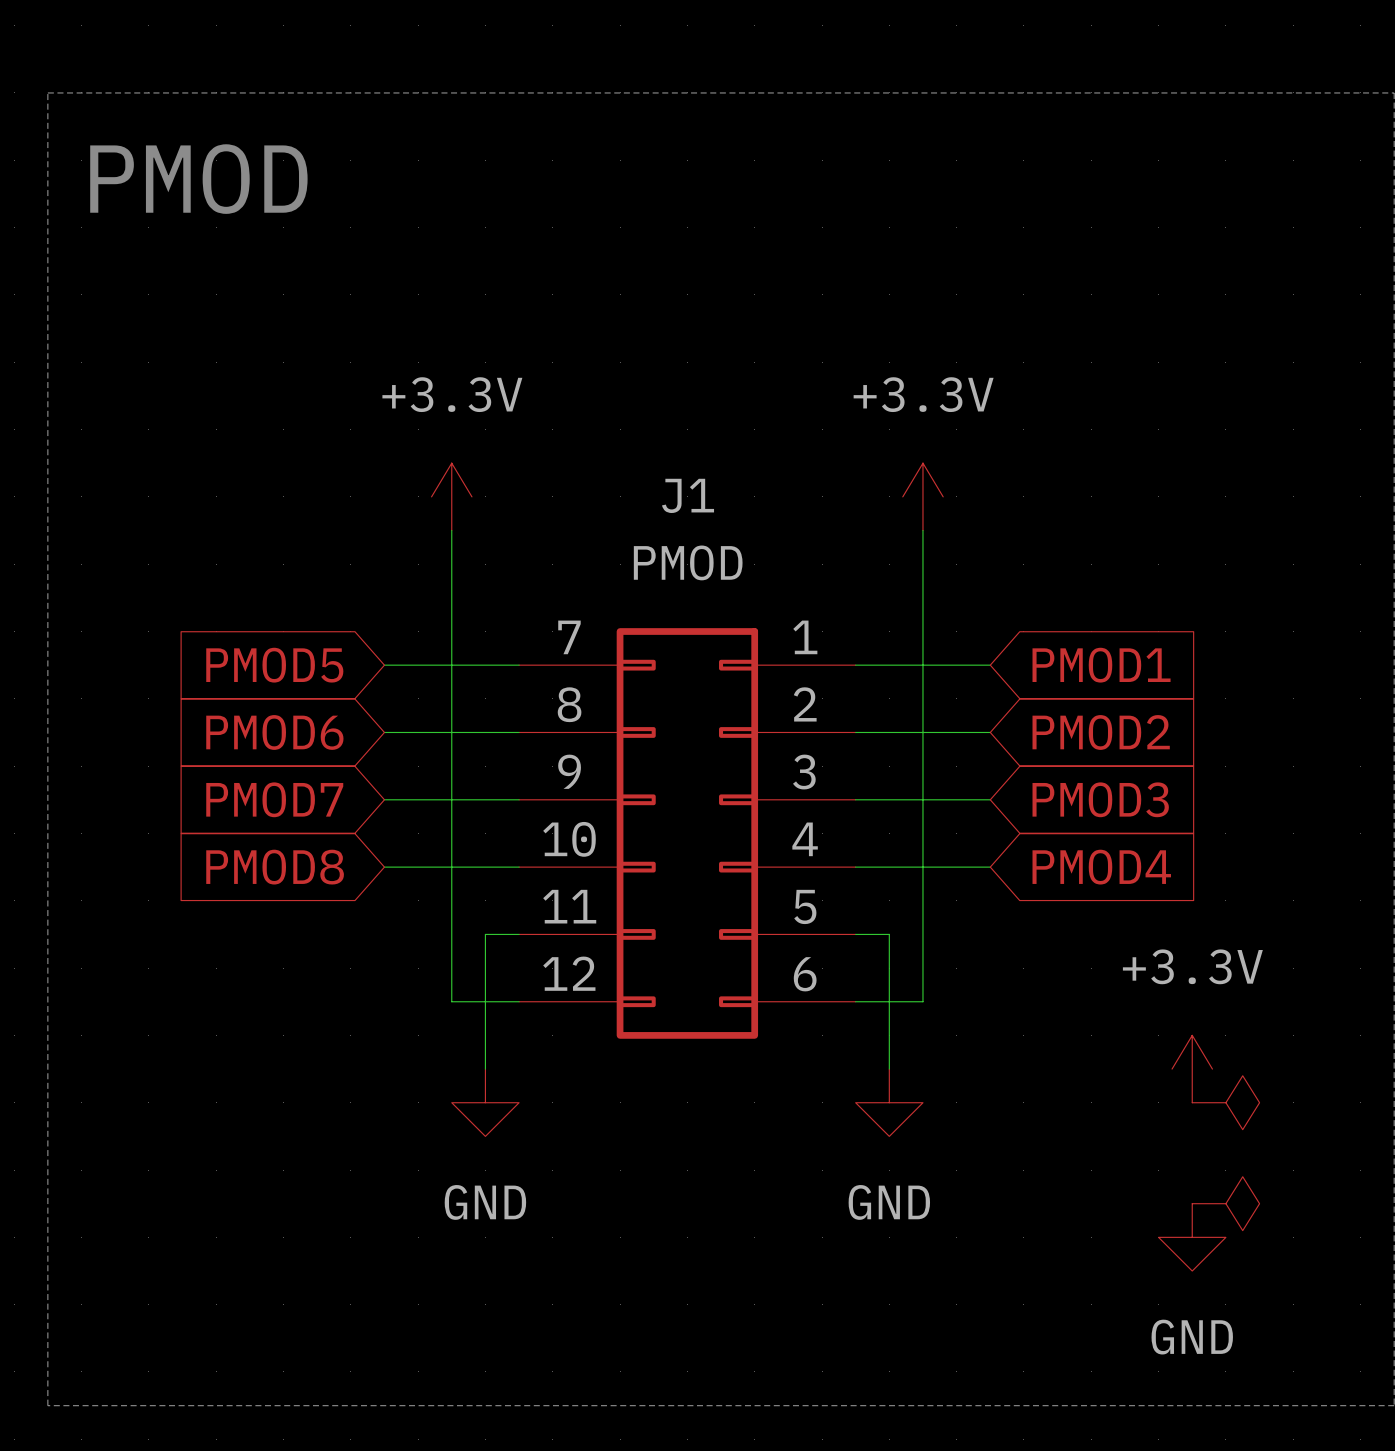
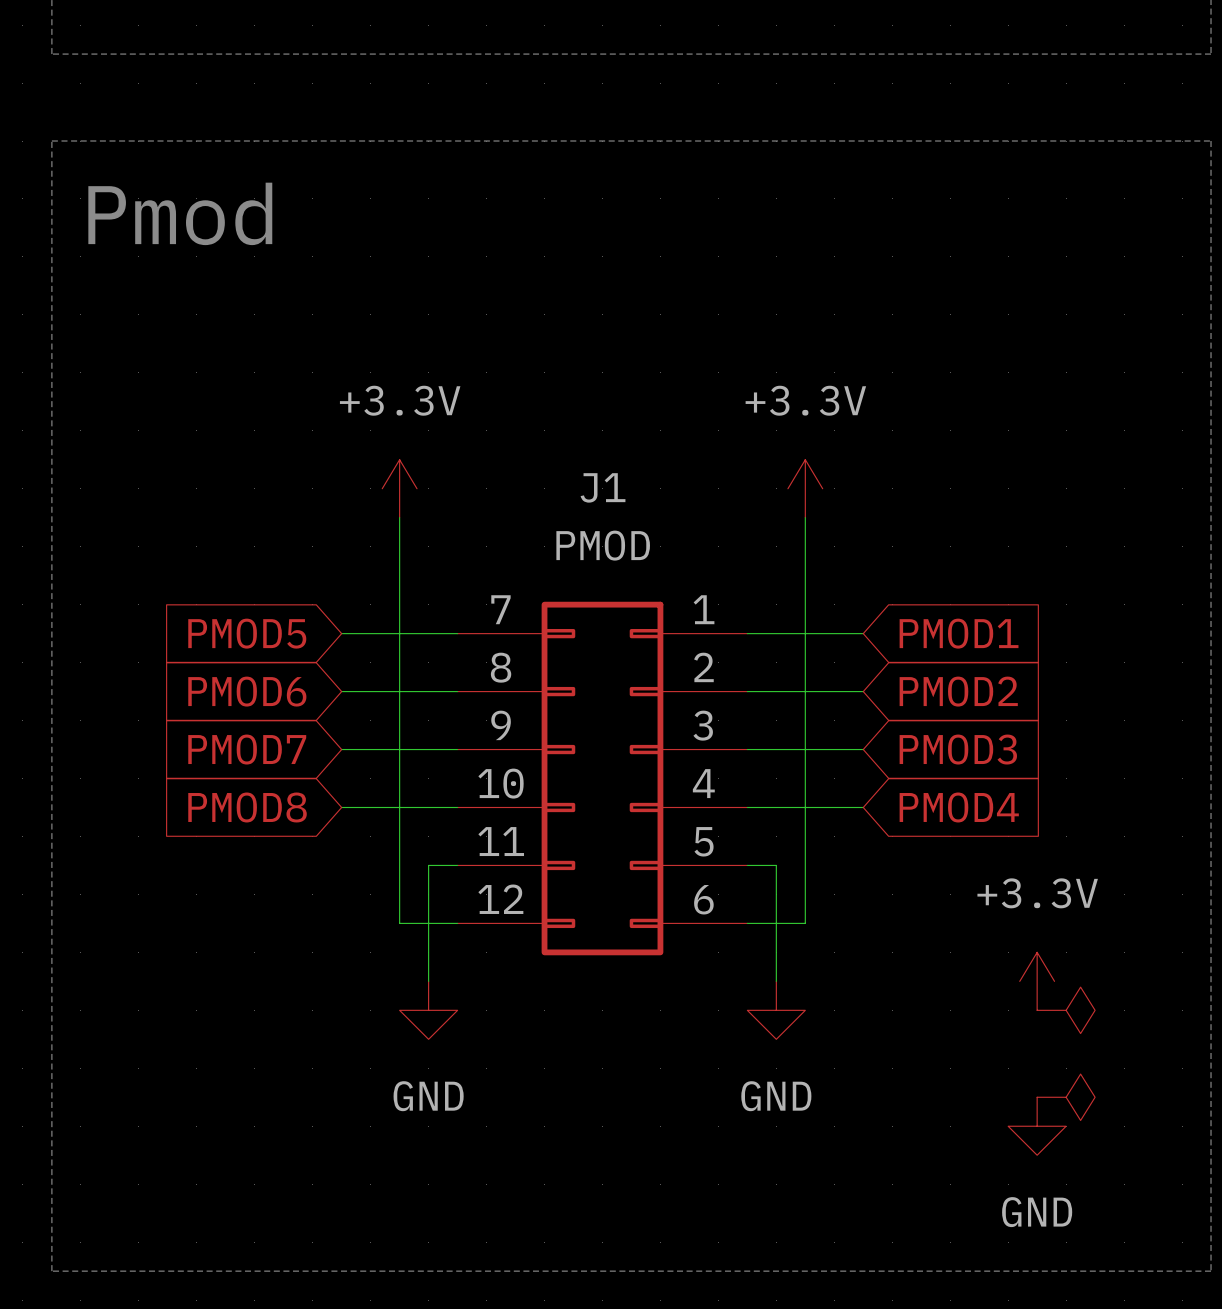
text: PMOD (198, 179) -> Pmod (180, 213)

